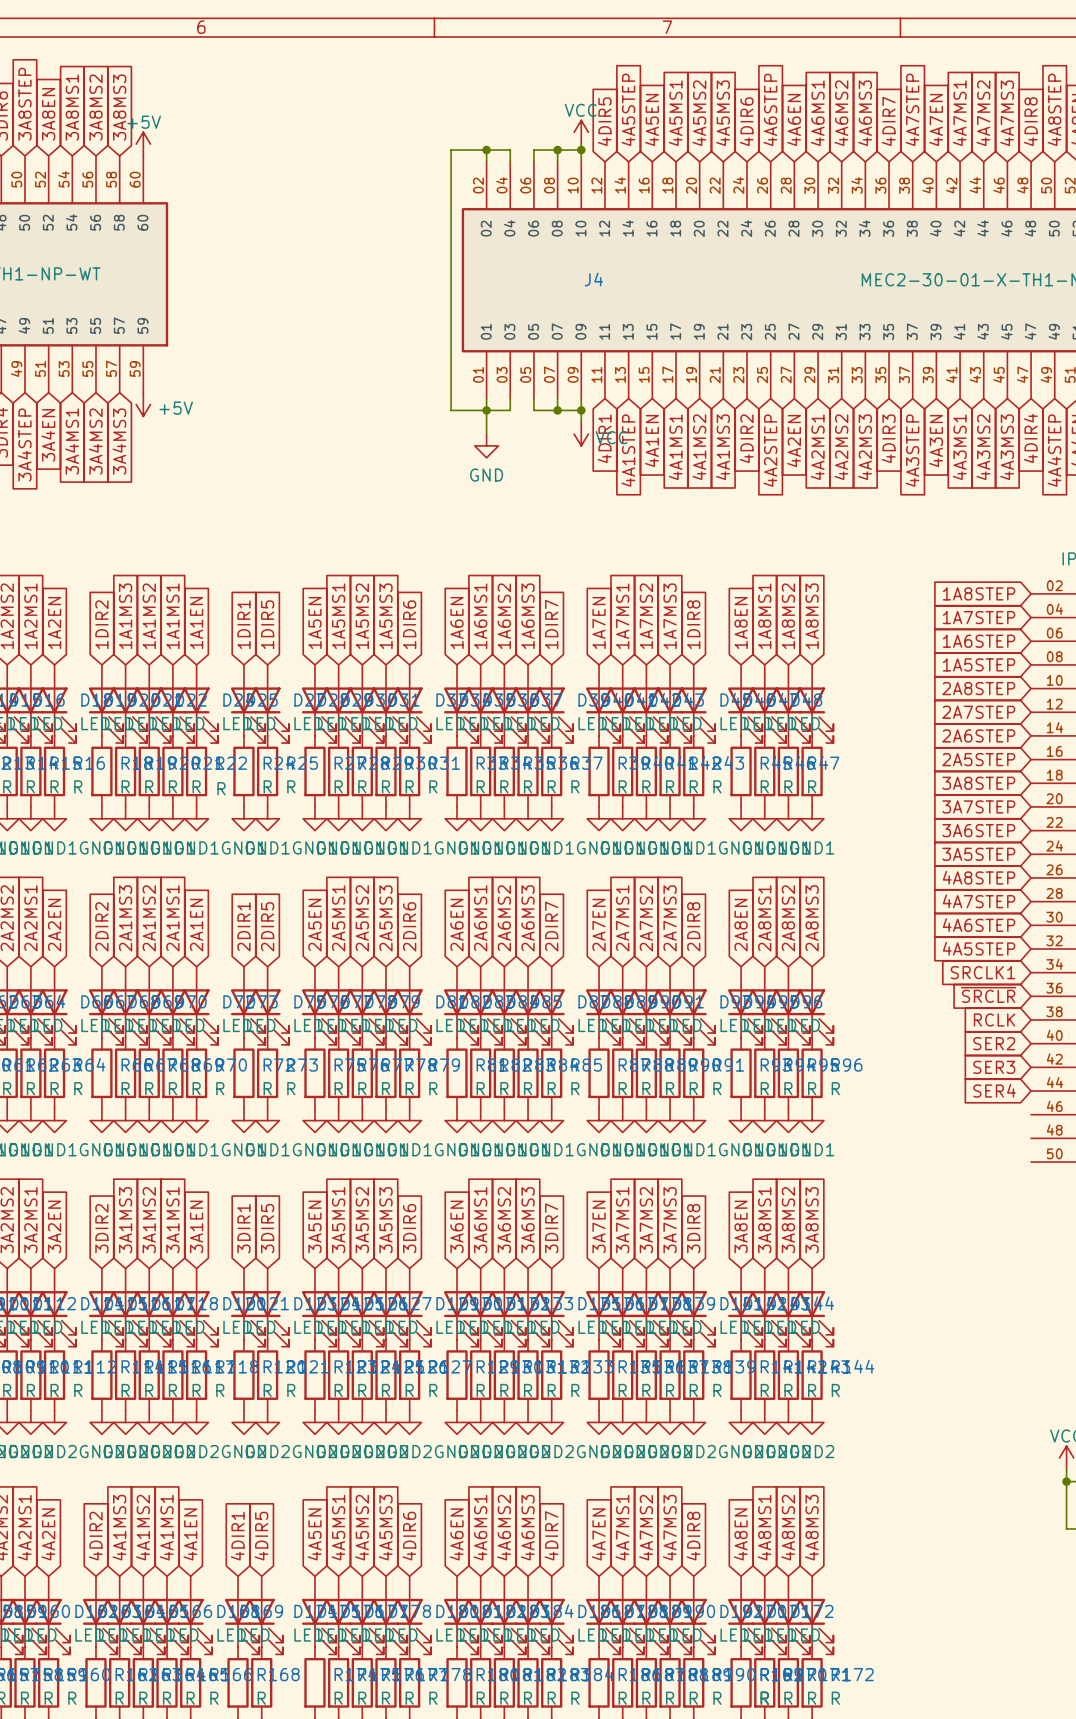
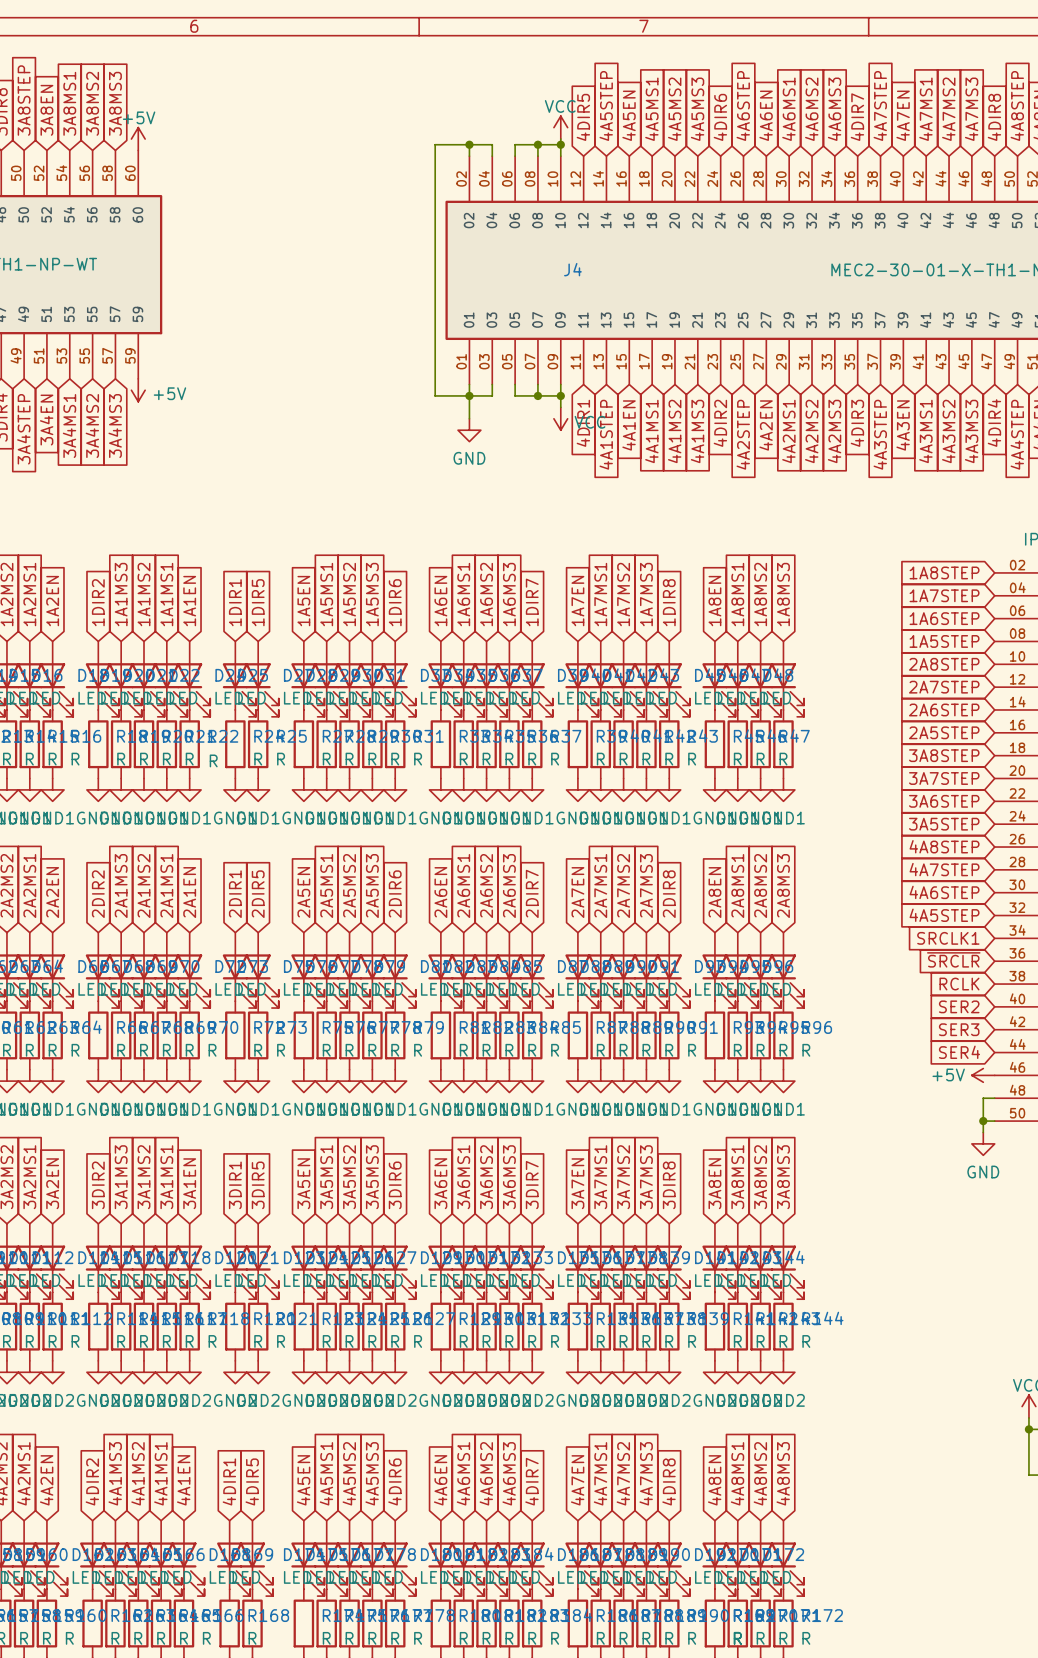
power symbol: none -> +5V (983, 1075)
wire: none -> (994, 1098) (983, 1098) (983, 1132)
wire: none -> (983, 1121) (994, 1121)
junction: none -> (983, 1121)
power symbol: none -> GND (983, 1143)

